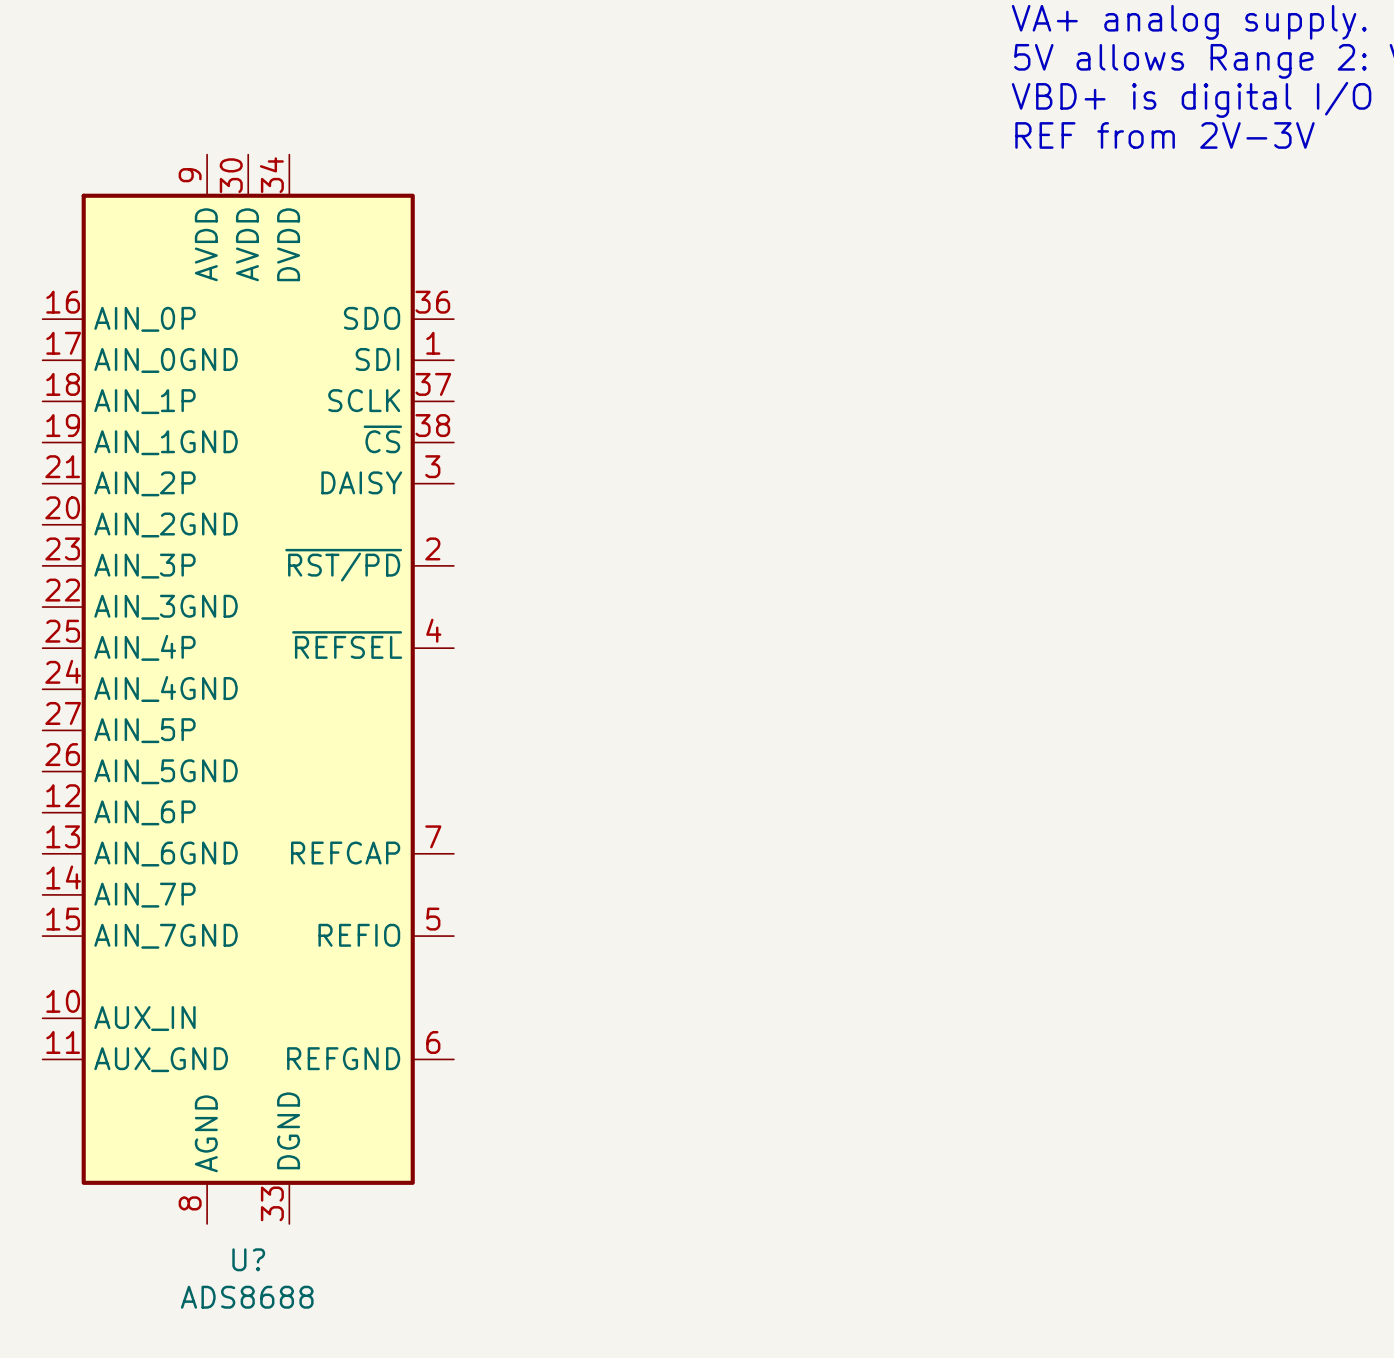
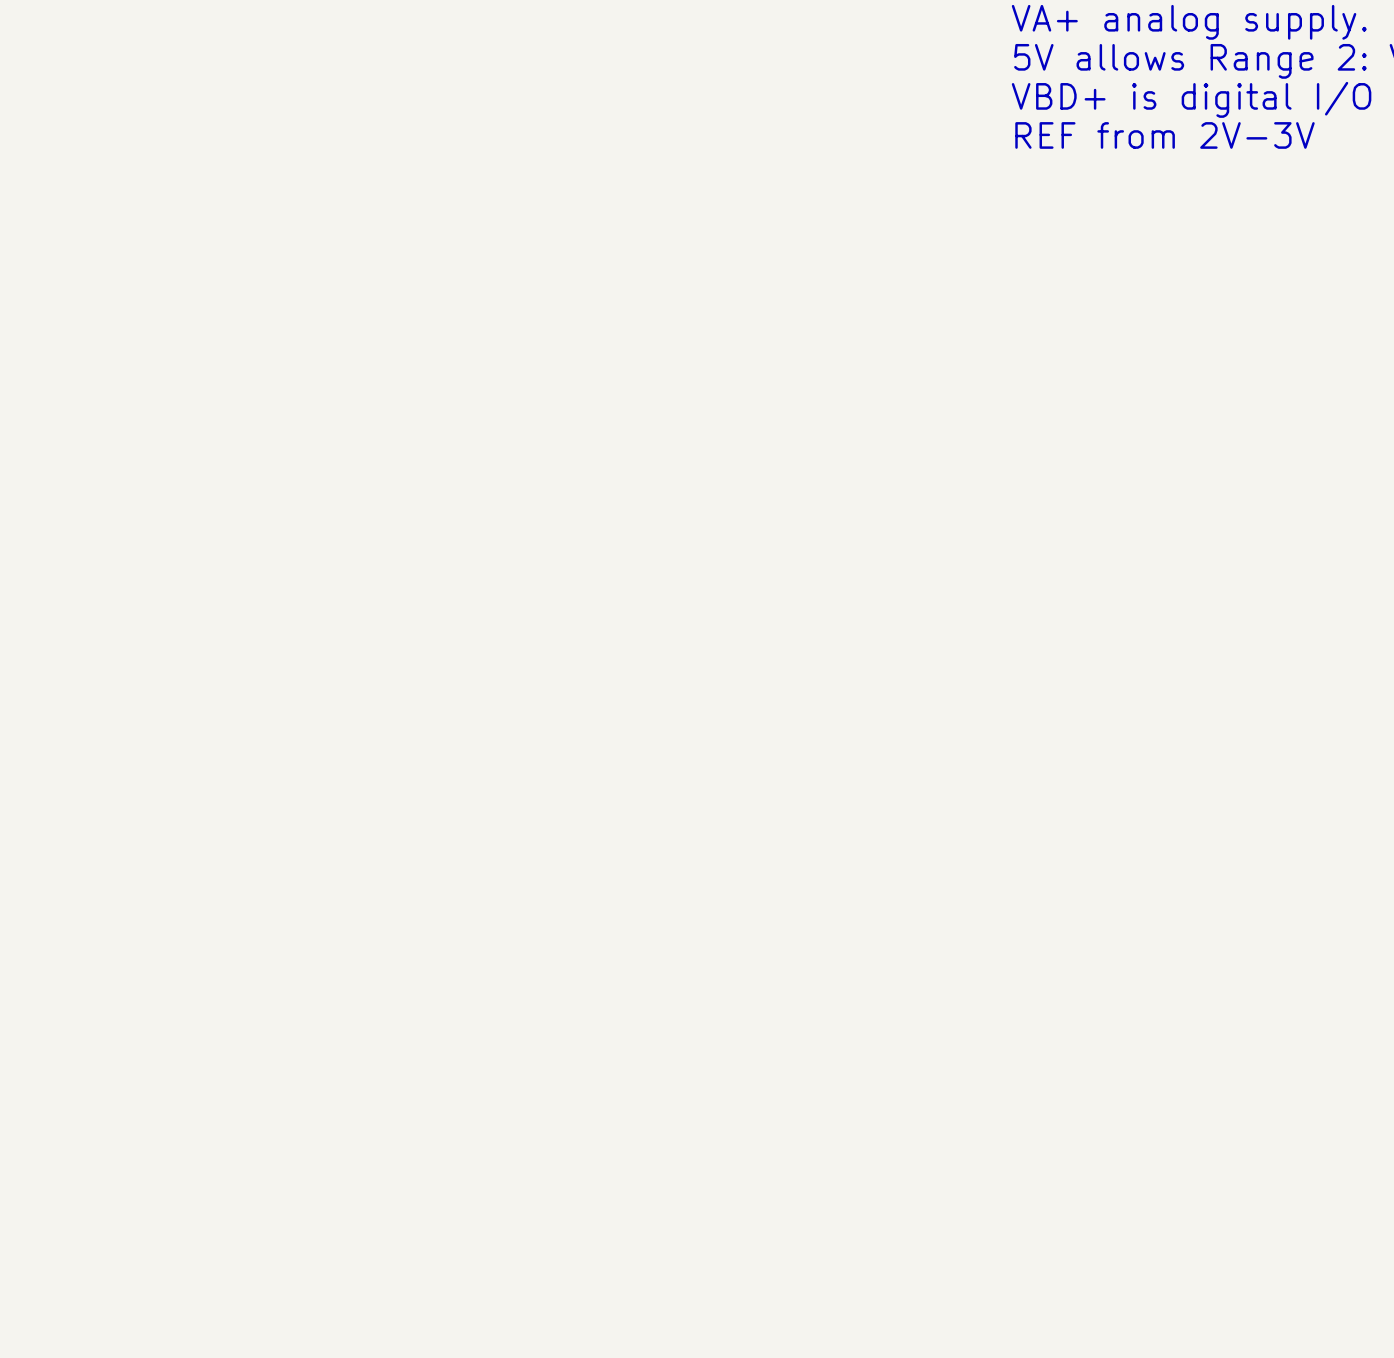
U?: ADS8688 (248, 689) -> none

